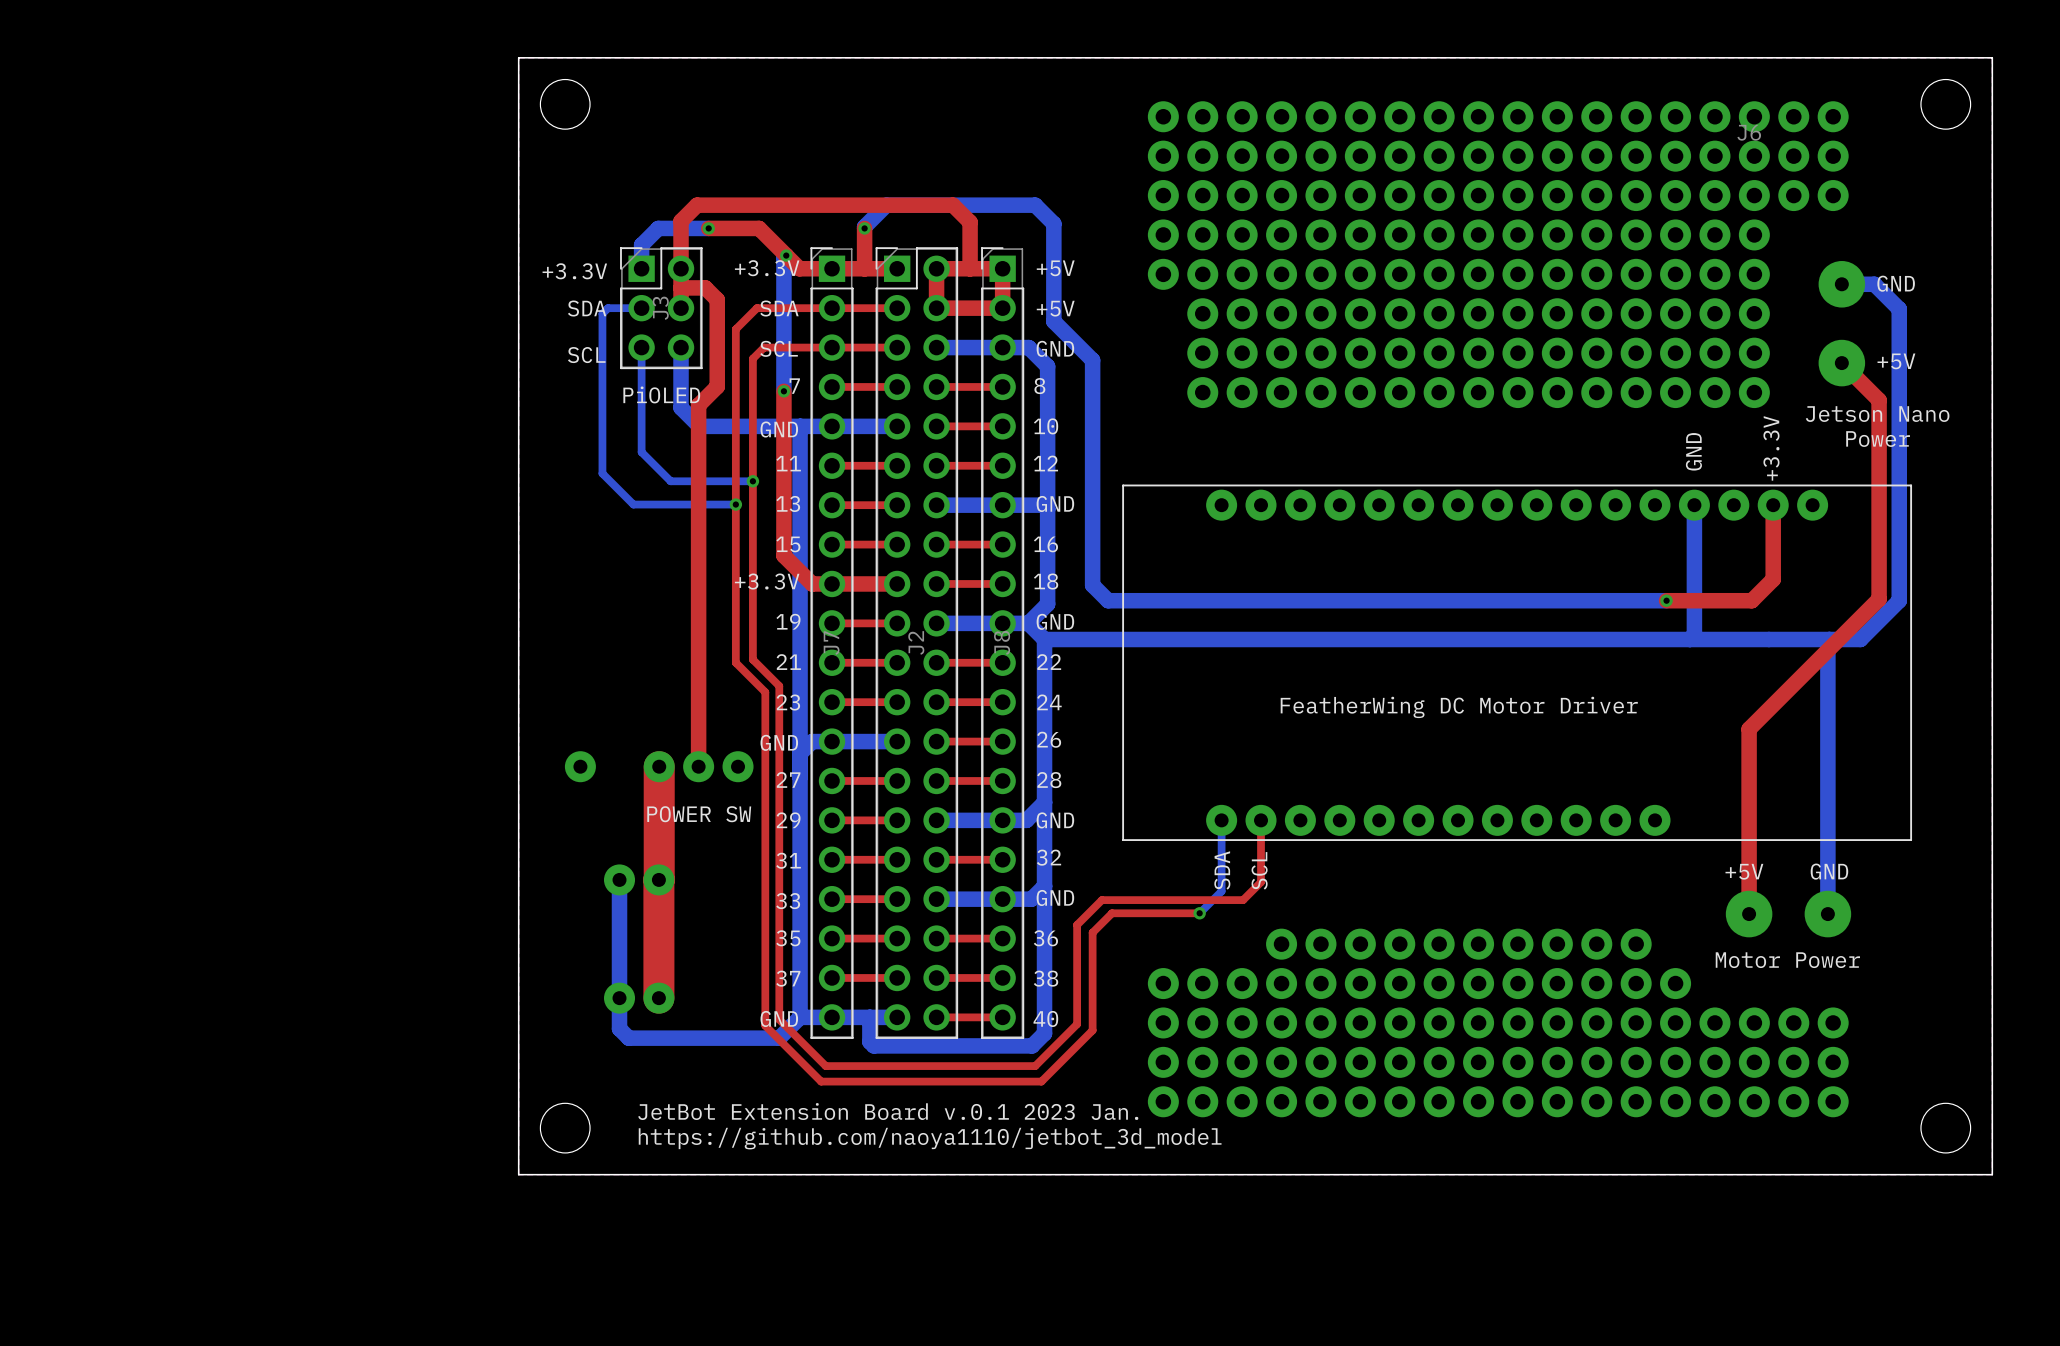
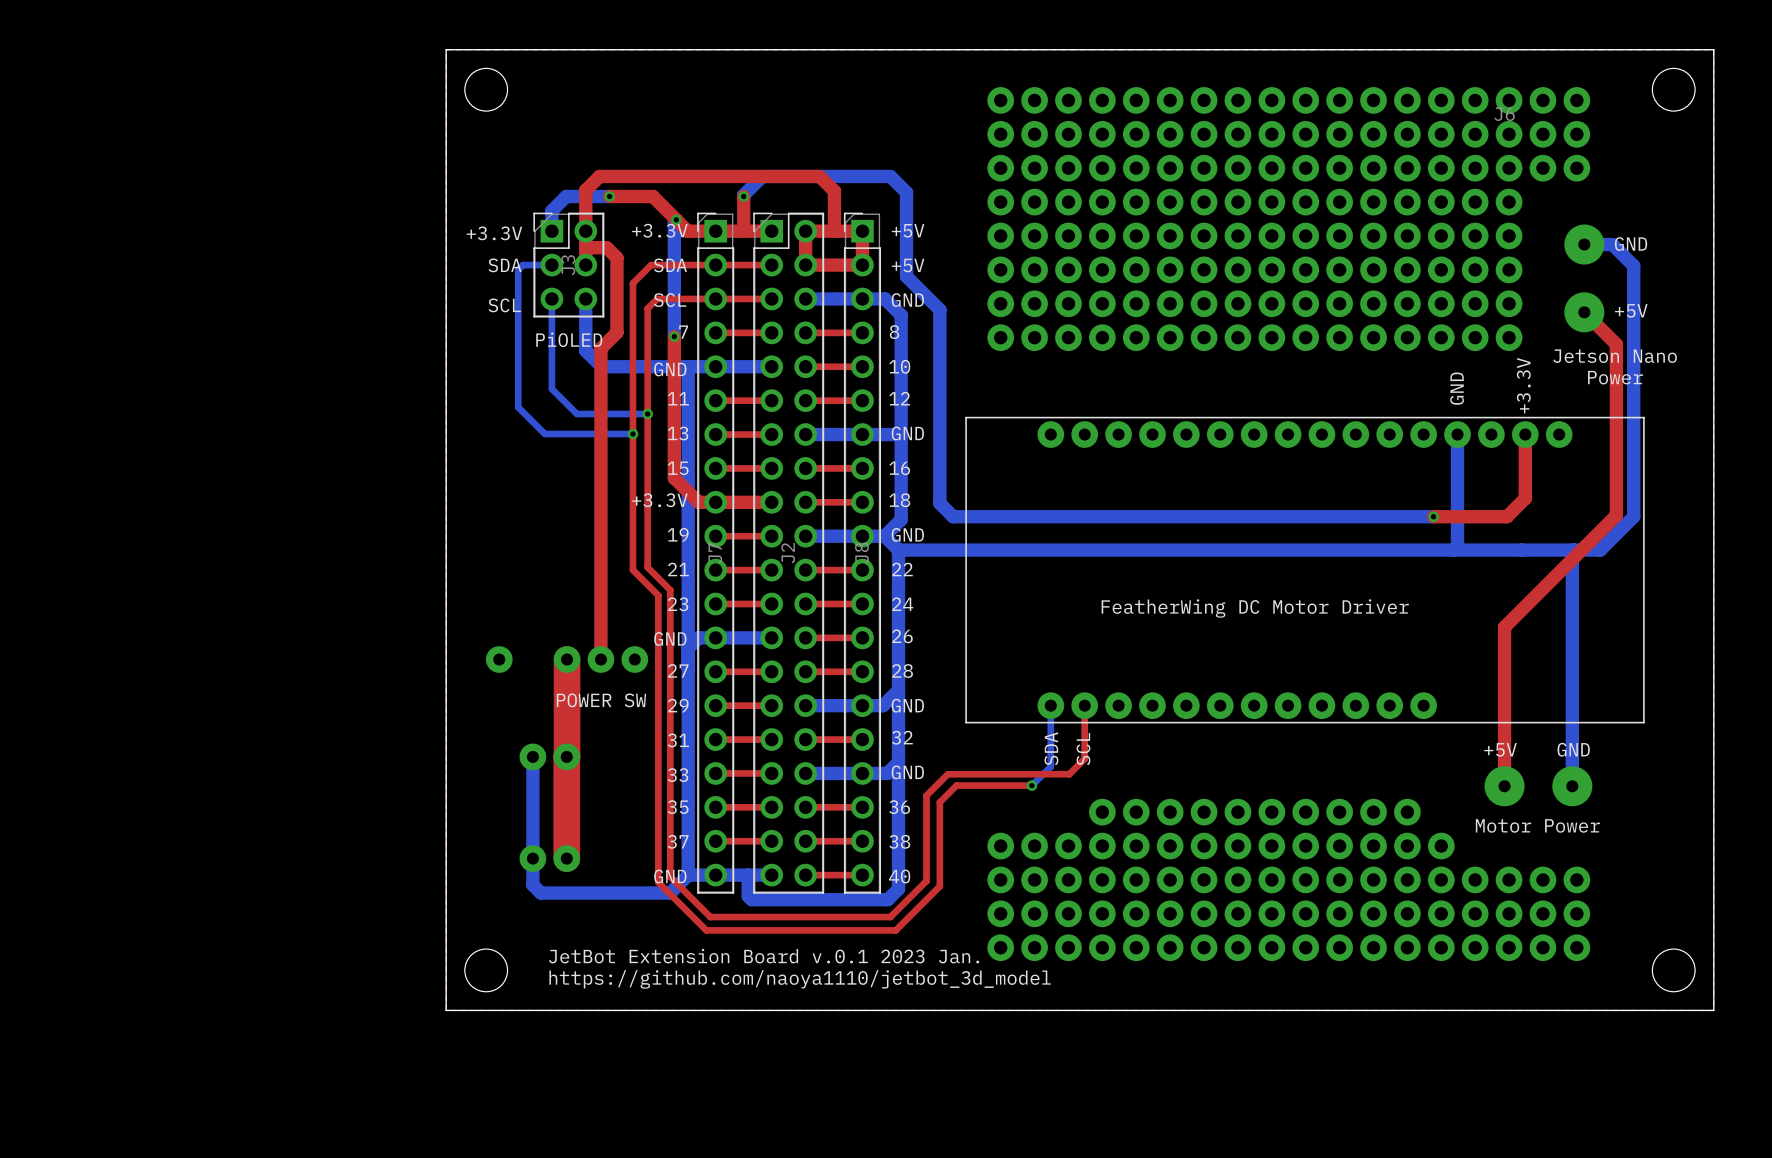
part: none -> (1000, 269)
part: none -> (1000, 303)
part: none -> (1000, 337)

